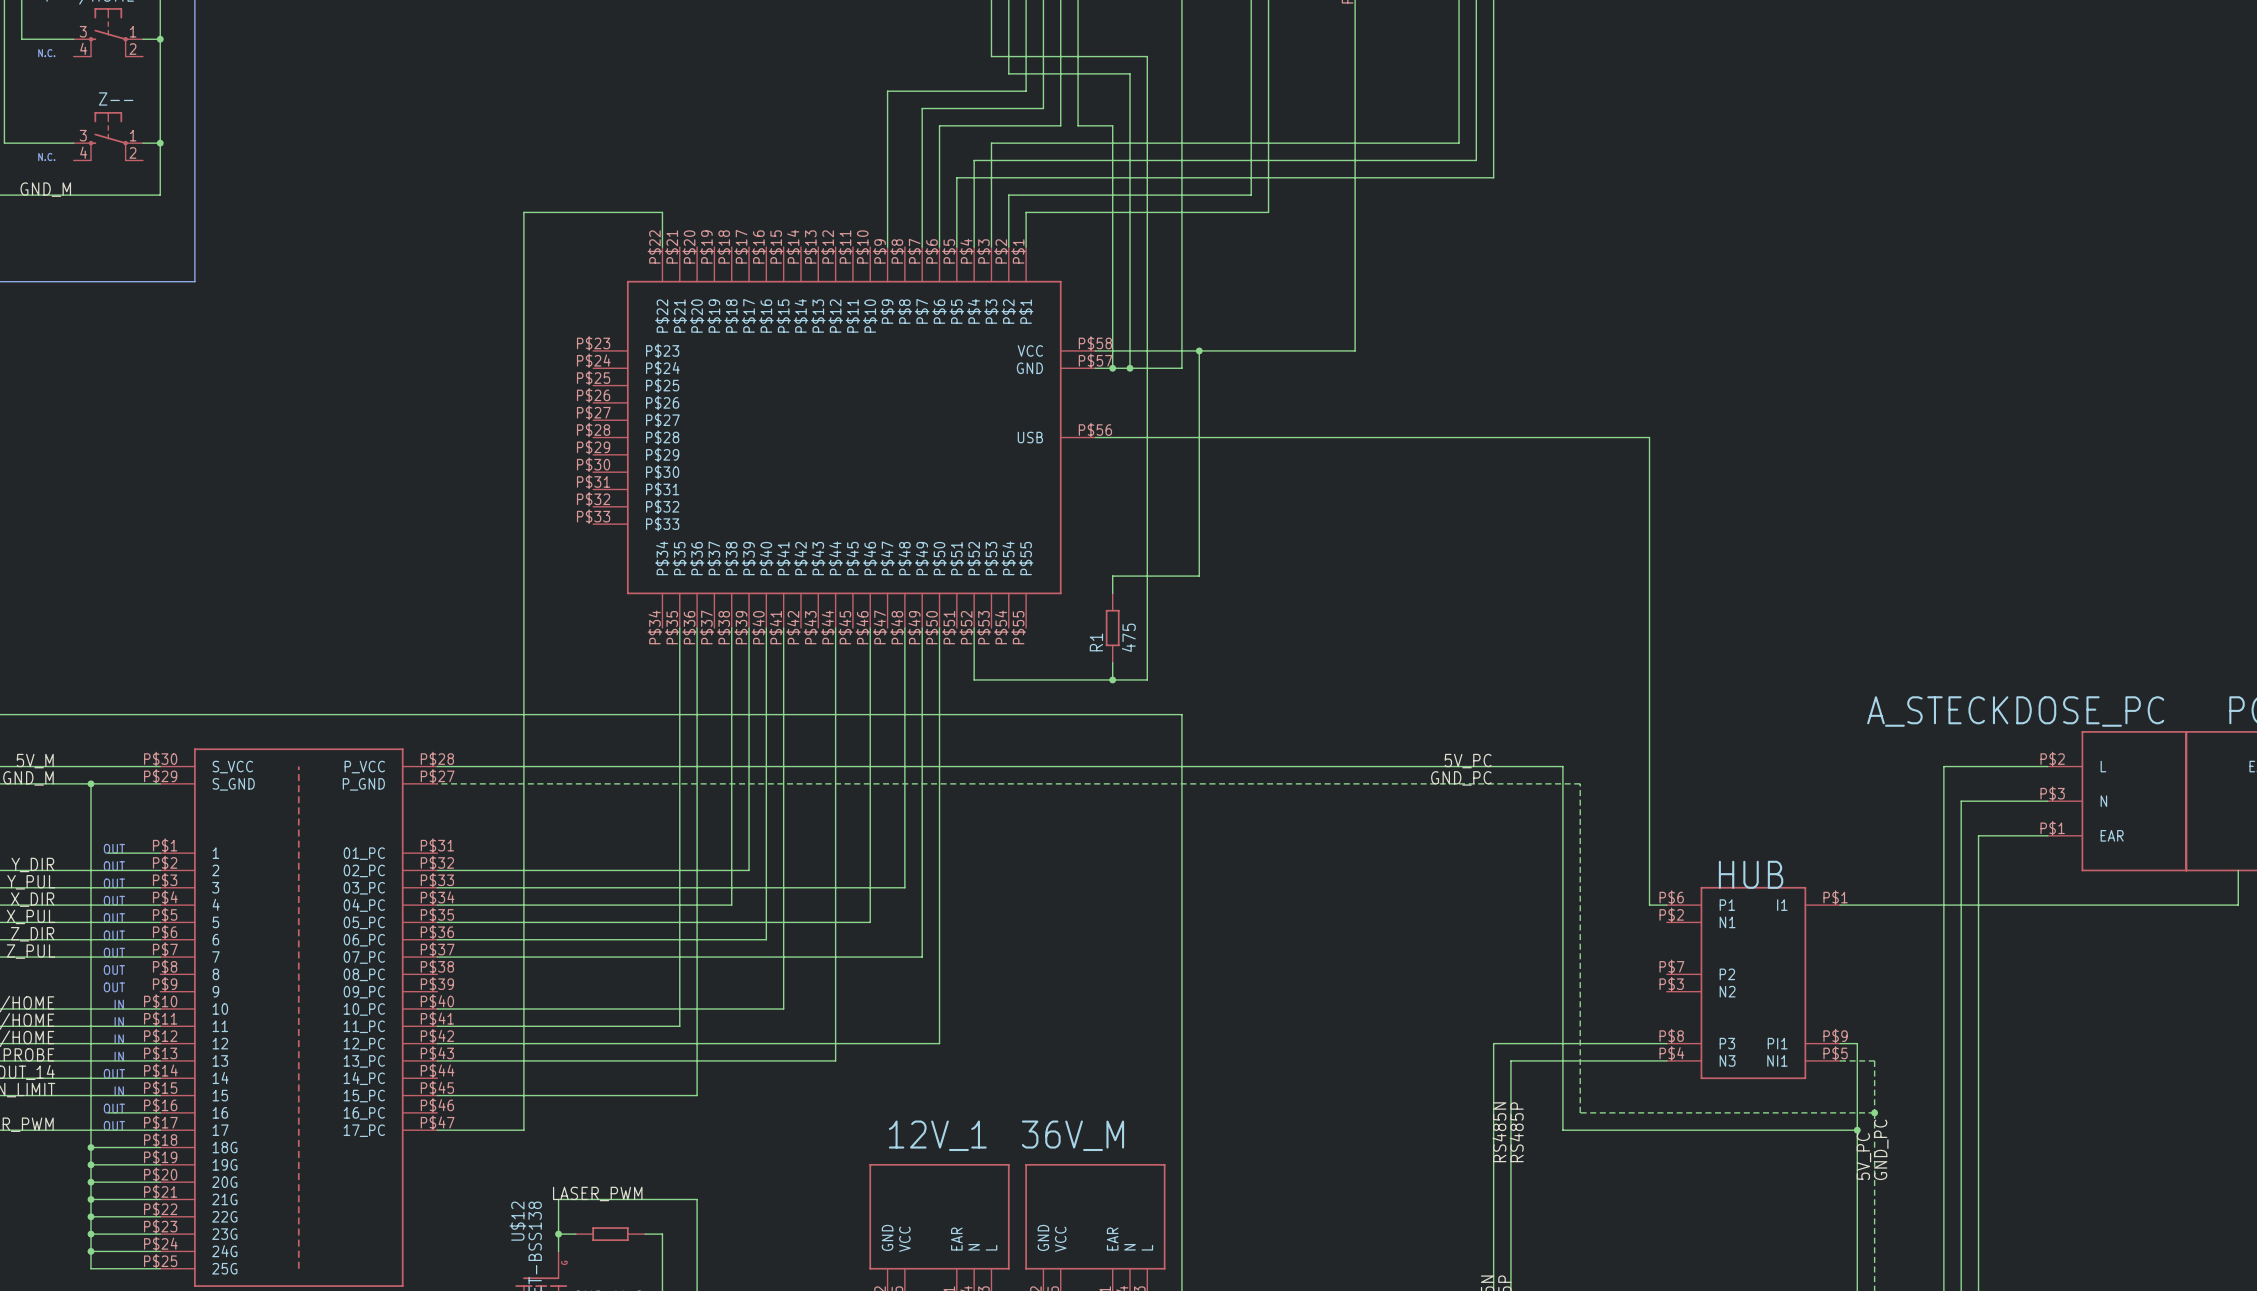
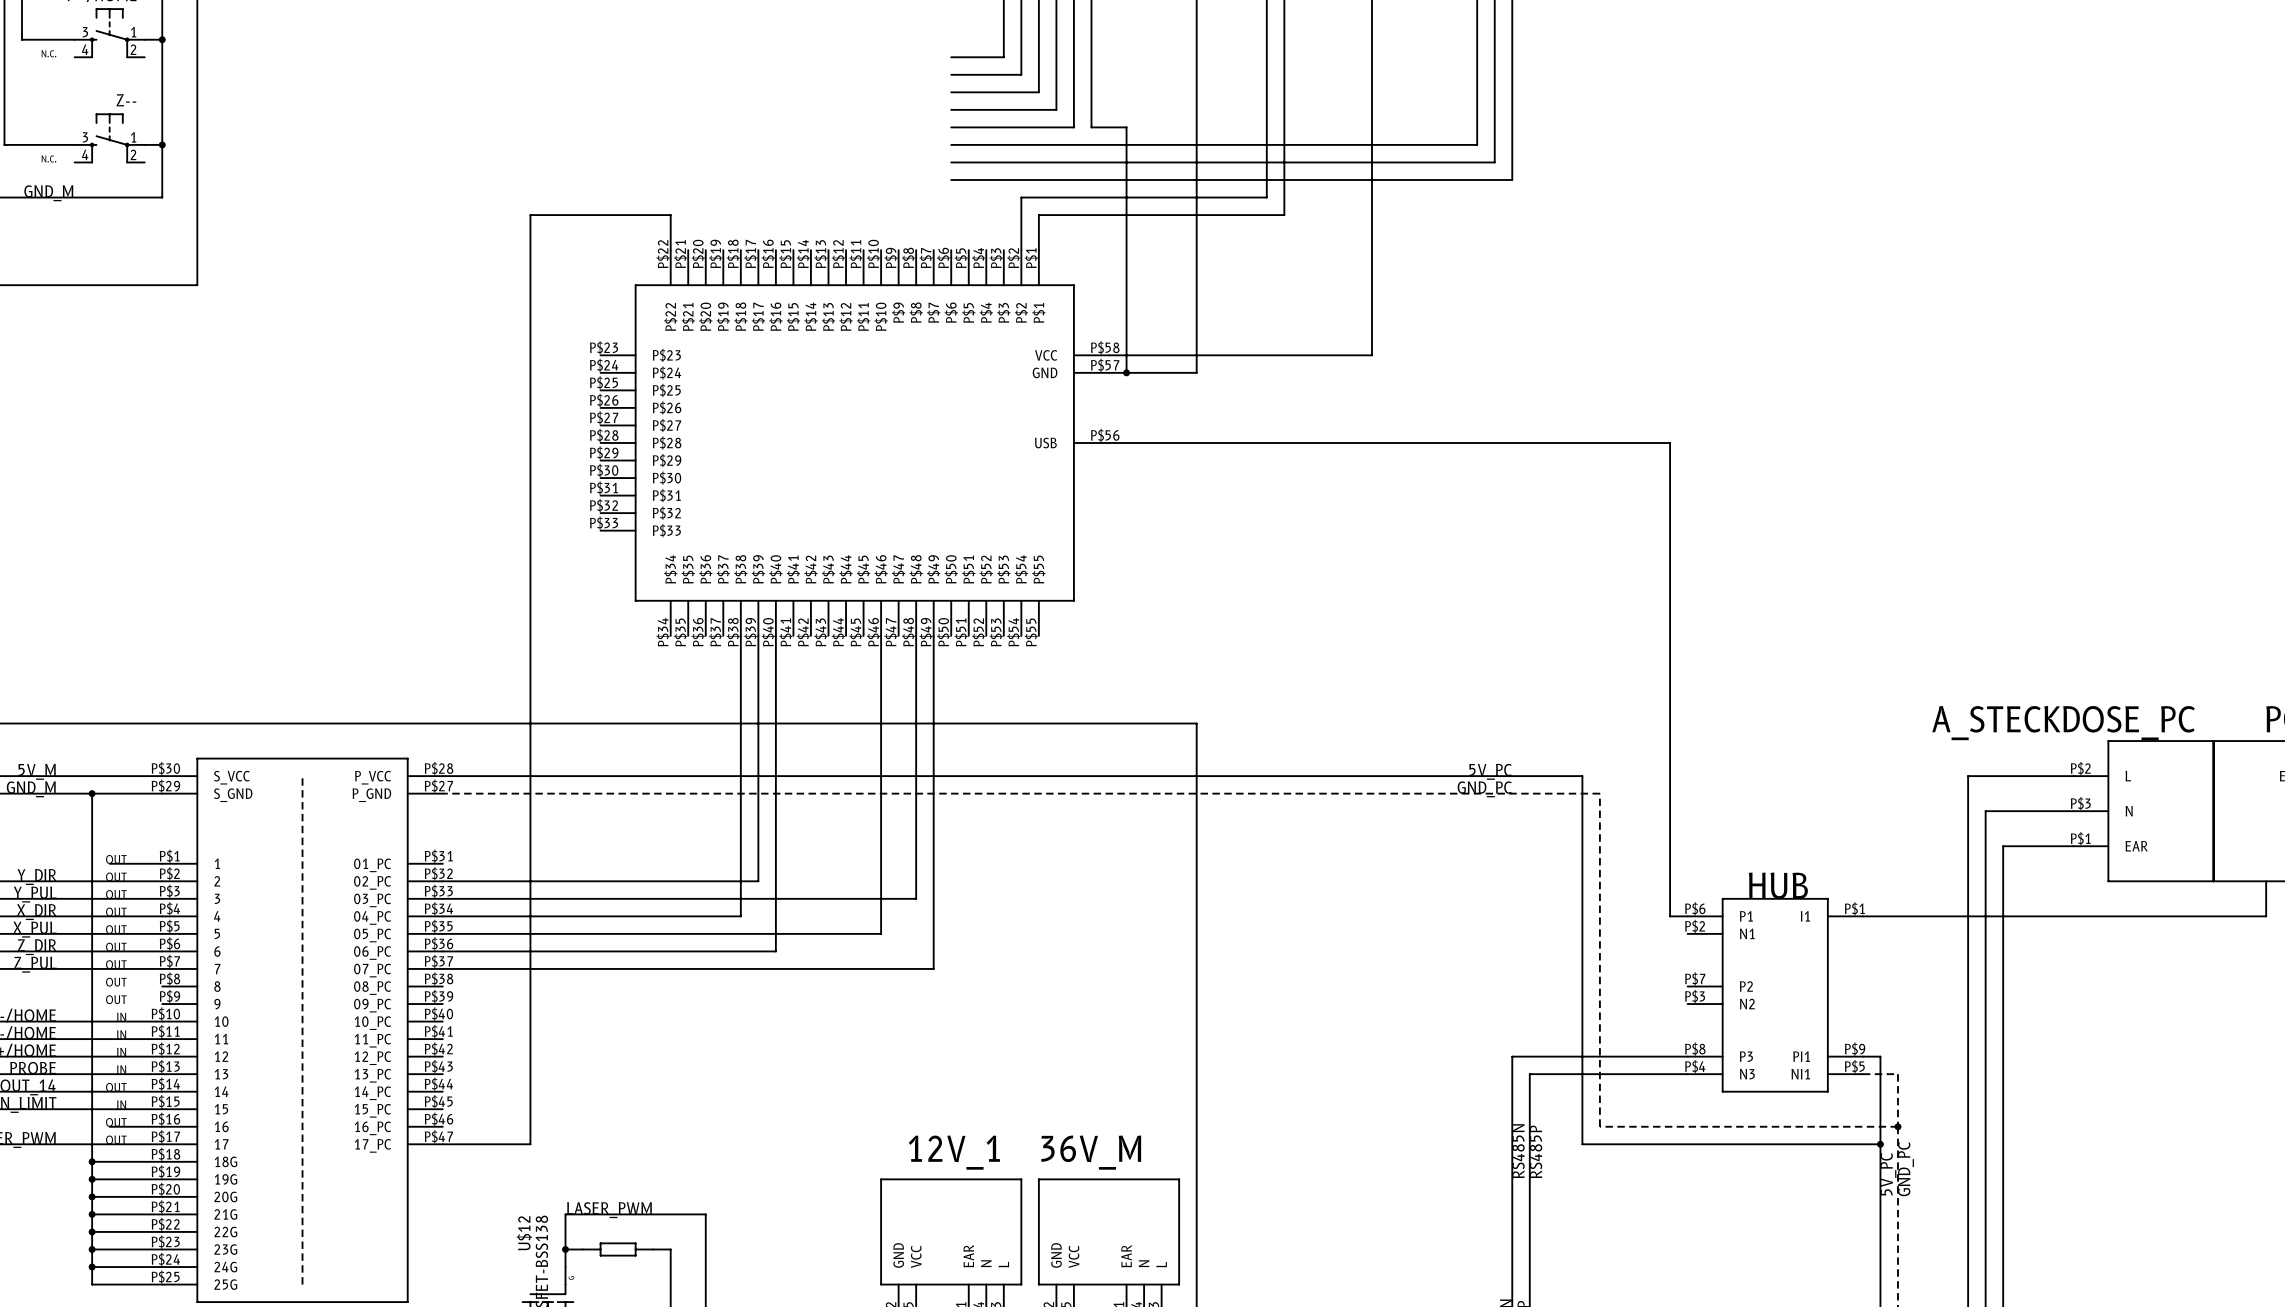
wire: (991, 56) (1147, 56) (1147, 679) (974, 679) (974, 628) -> (1003, 57) (951, 57)
wire: (1008, 73) (1130, 73) (1130, 368) -> (1021, 74) (951, 74)
wire: (939, 91) (887, 91) (887, 247) -> none
wire: (939, 108) (922, 108) (922, 247) -> none
wire: (939, 125) (939, 247) -> none
wire: (991, 143) (991, 247) -> (1003, 144) (951, 144)
wire: (974, 160) (974, 247) -> (986, 162) (951, 162)
wire: (956, 177) (956, 247) -> (968, 180) (951, 180)
wire: (1199, 350) (1199, 576) (1112, 576) (1112, 593) -> none
junction: (1199, 350) -> none
junction: (1130, 368) -> none
wire: (679, 628) (679, 1026) (437, 1026) -> none
wire: (697, 628) (697, 1095) (437, 1095) -> none
wire: (783, 628) (783, 1008) (437, 1008) -> none
wire: (835, 628) (835, 1060) (437, 1060) -> none
wire: (939, 628) (939, 1043) (437, 1043) -> none
R1: 475 (1112, 628) -> none
wire: (1112, 662) (1112, 679) -> none
junction: (1112, 679) -> none

